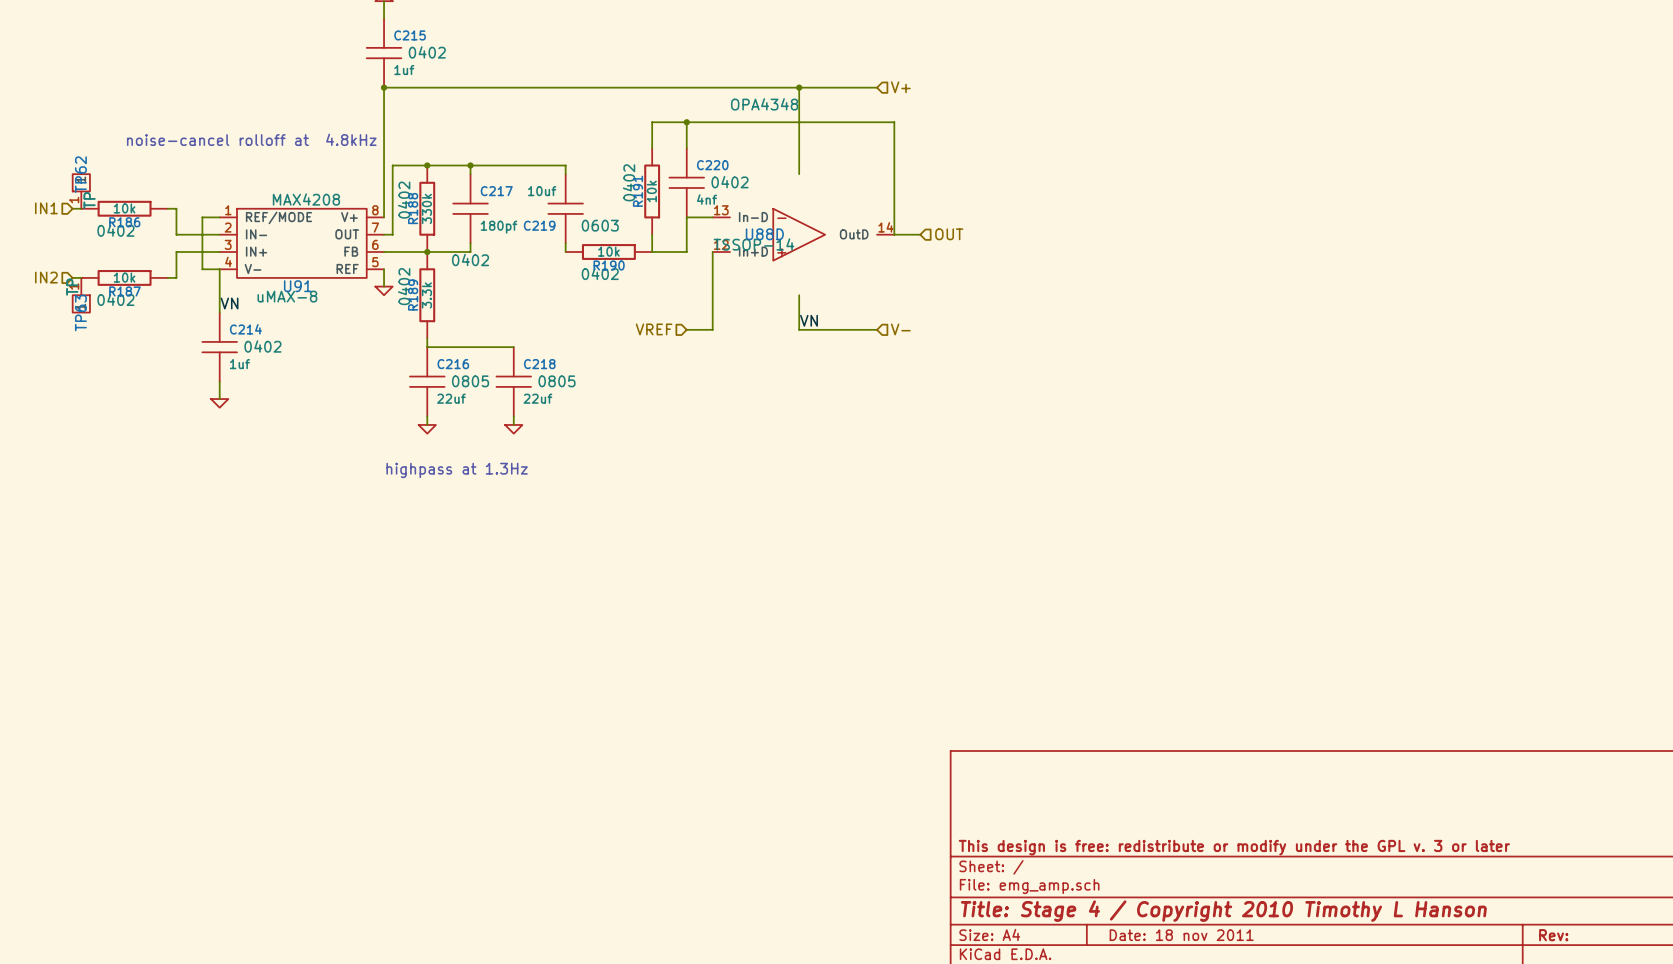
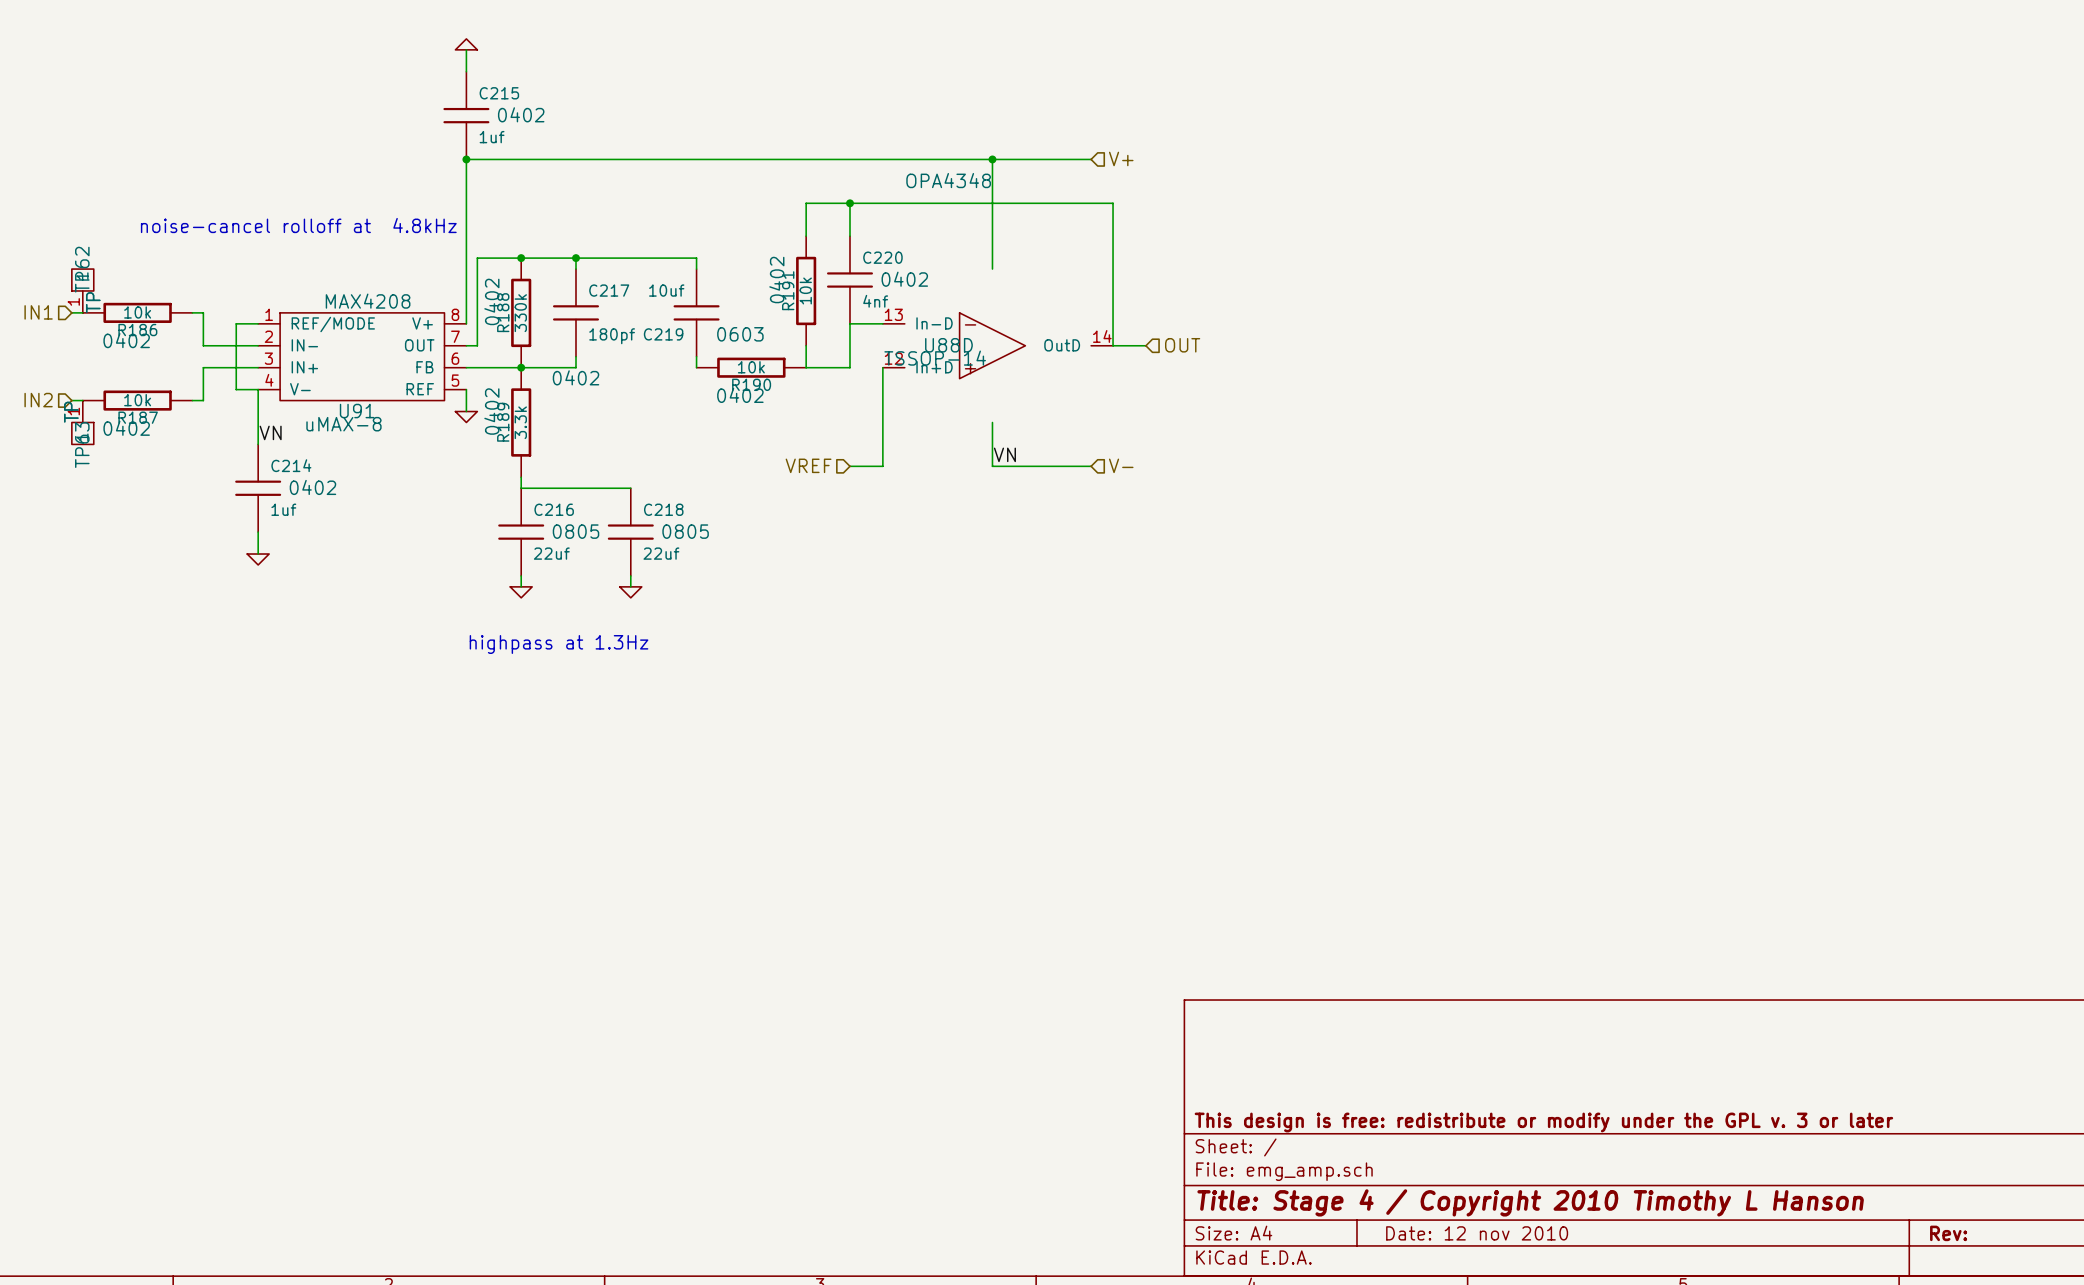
title block: Date: 18 nov 2011 (1181, 935) -> Date: 12 nov 2010 (1477, 1233)

